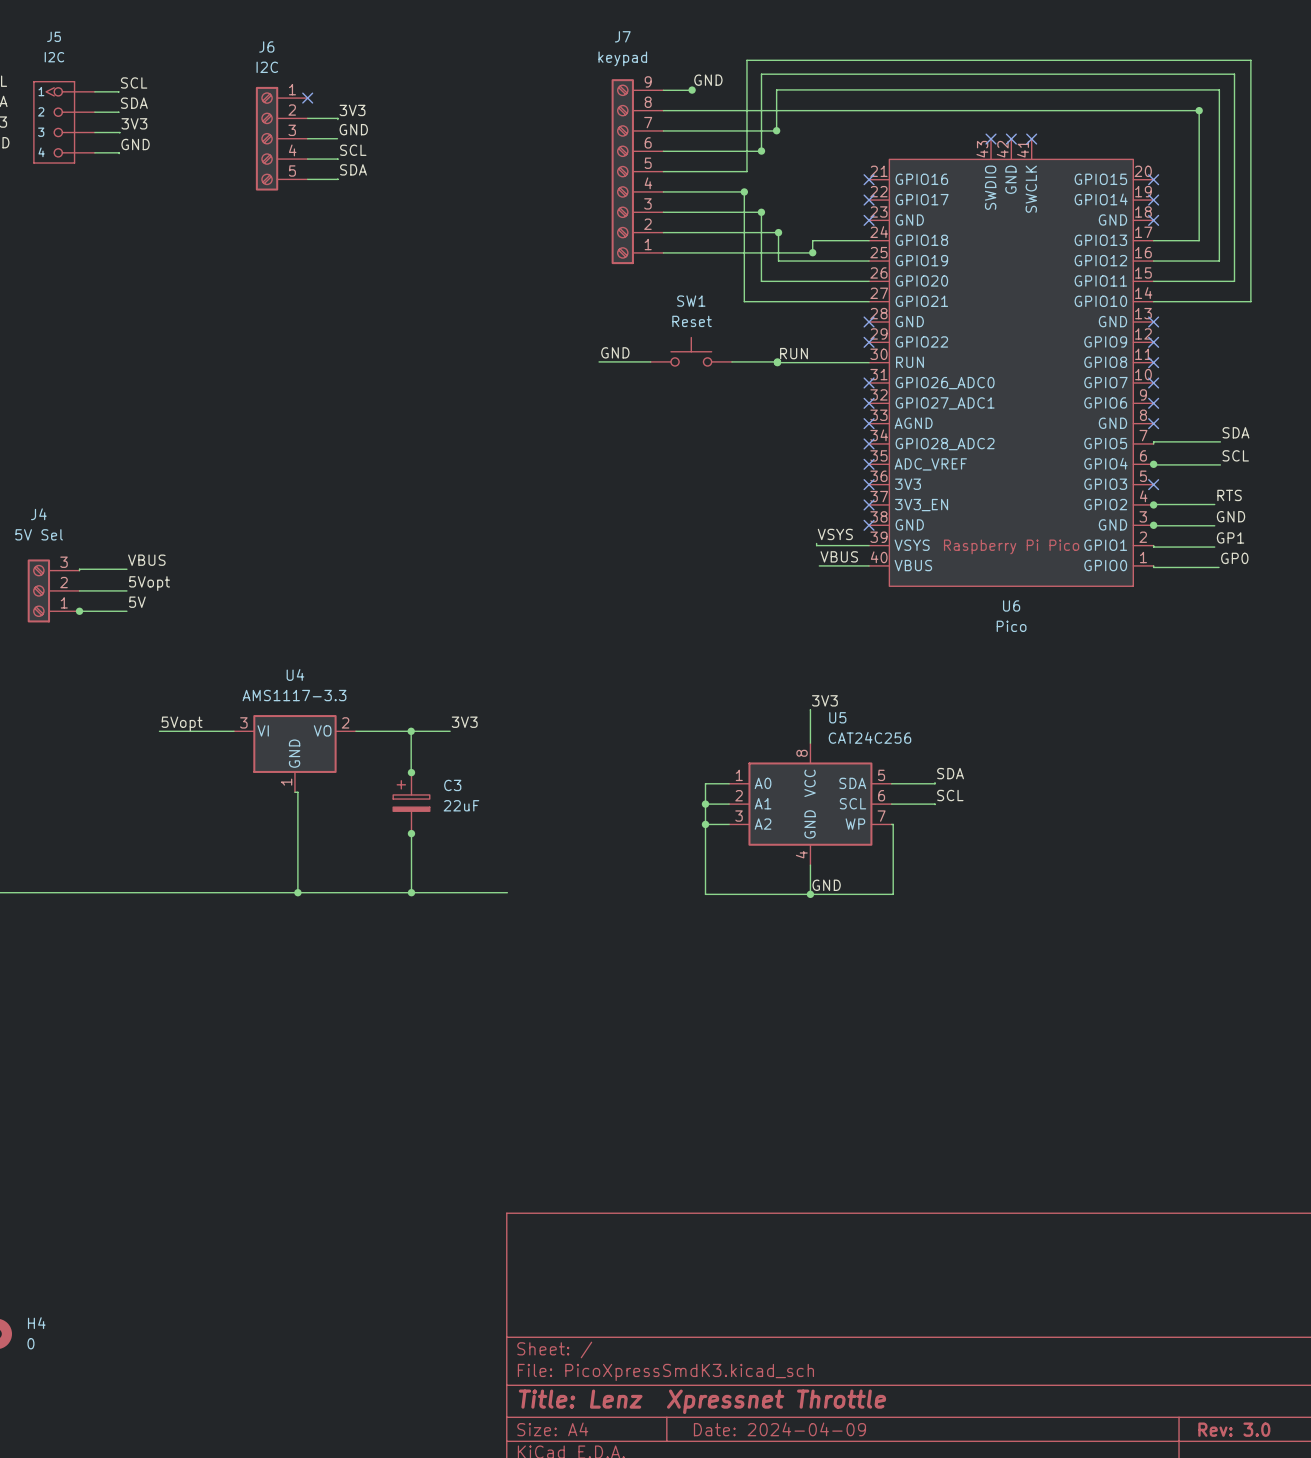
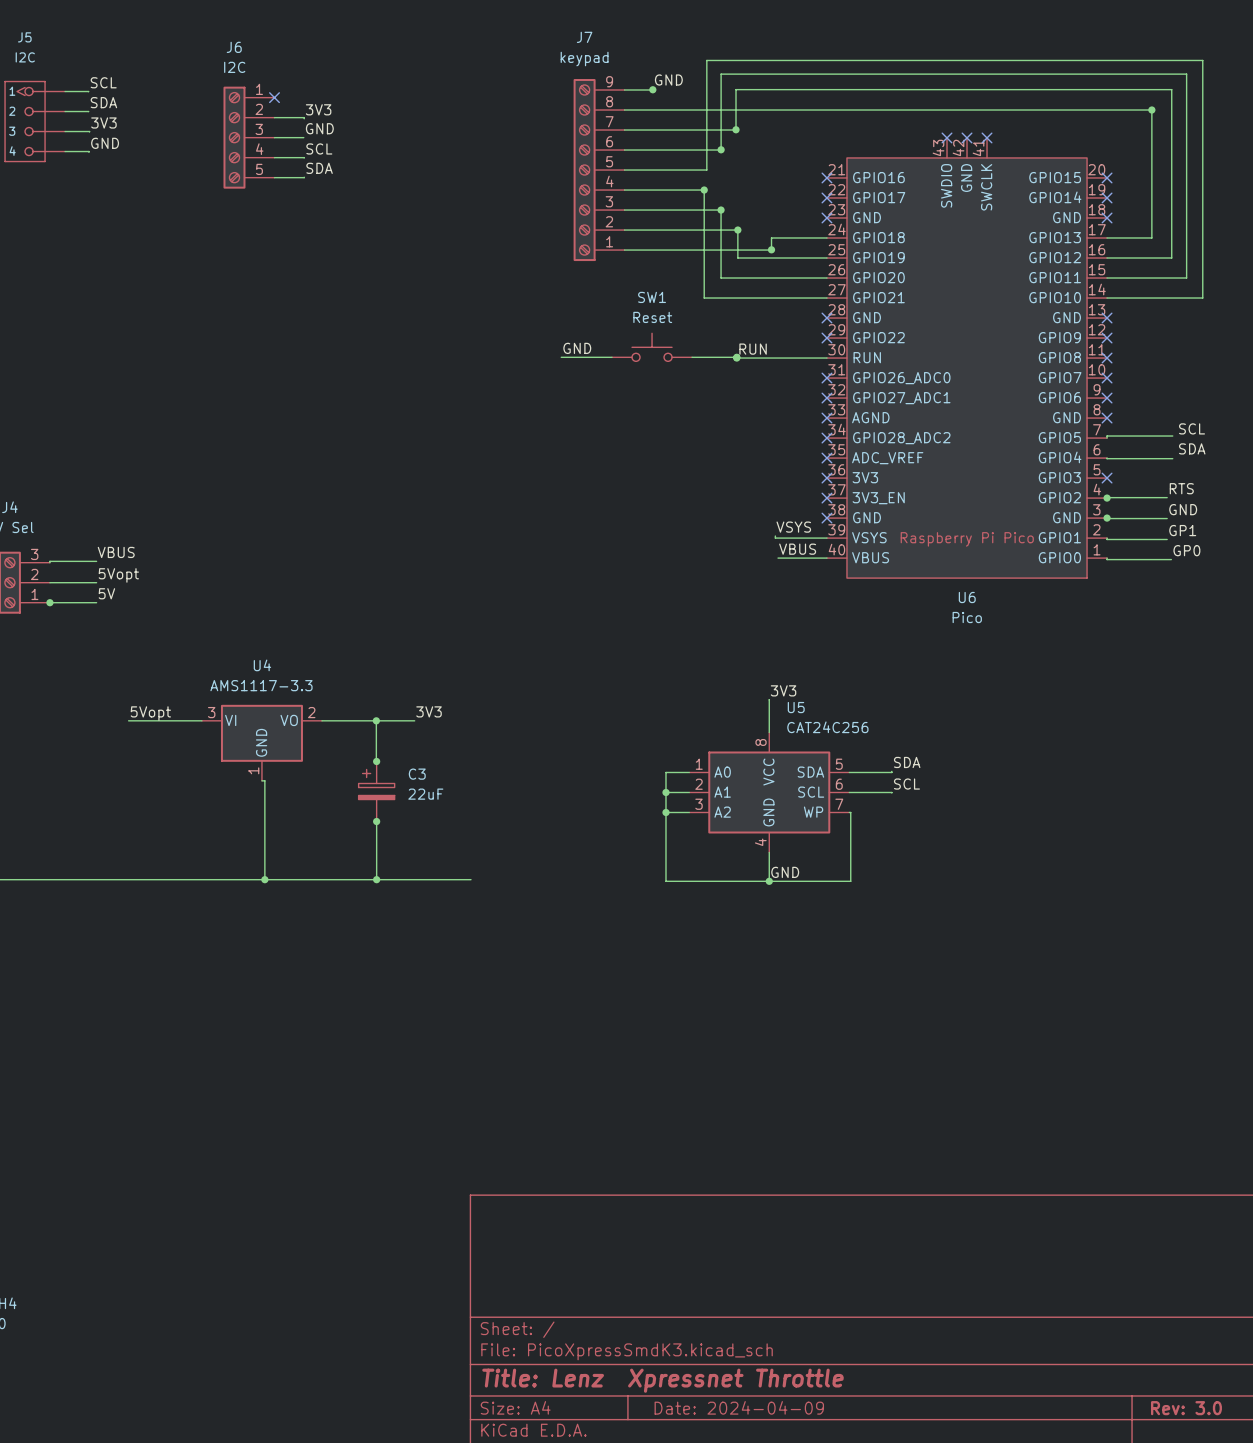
label: SDA (1235, 432) -> SCL (1192, 428)
label: SCL (1235, 455) -> SDA (1192, 448)
junction: (1153, 464) -> none

